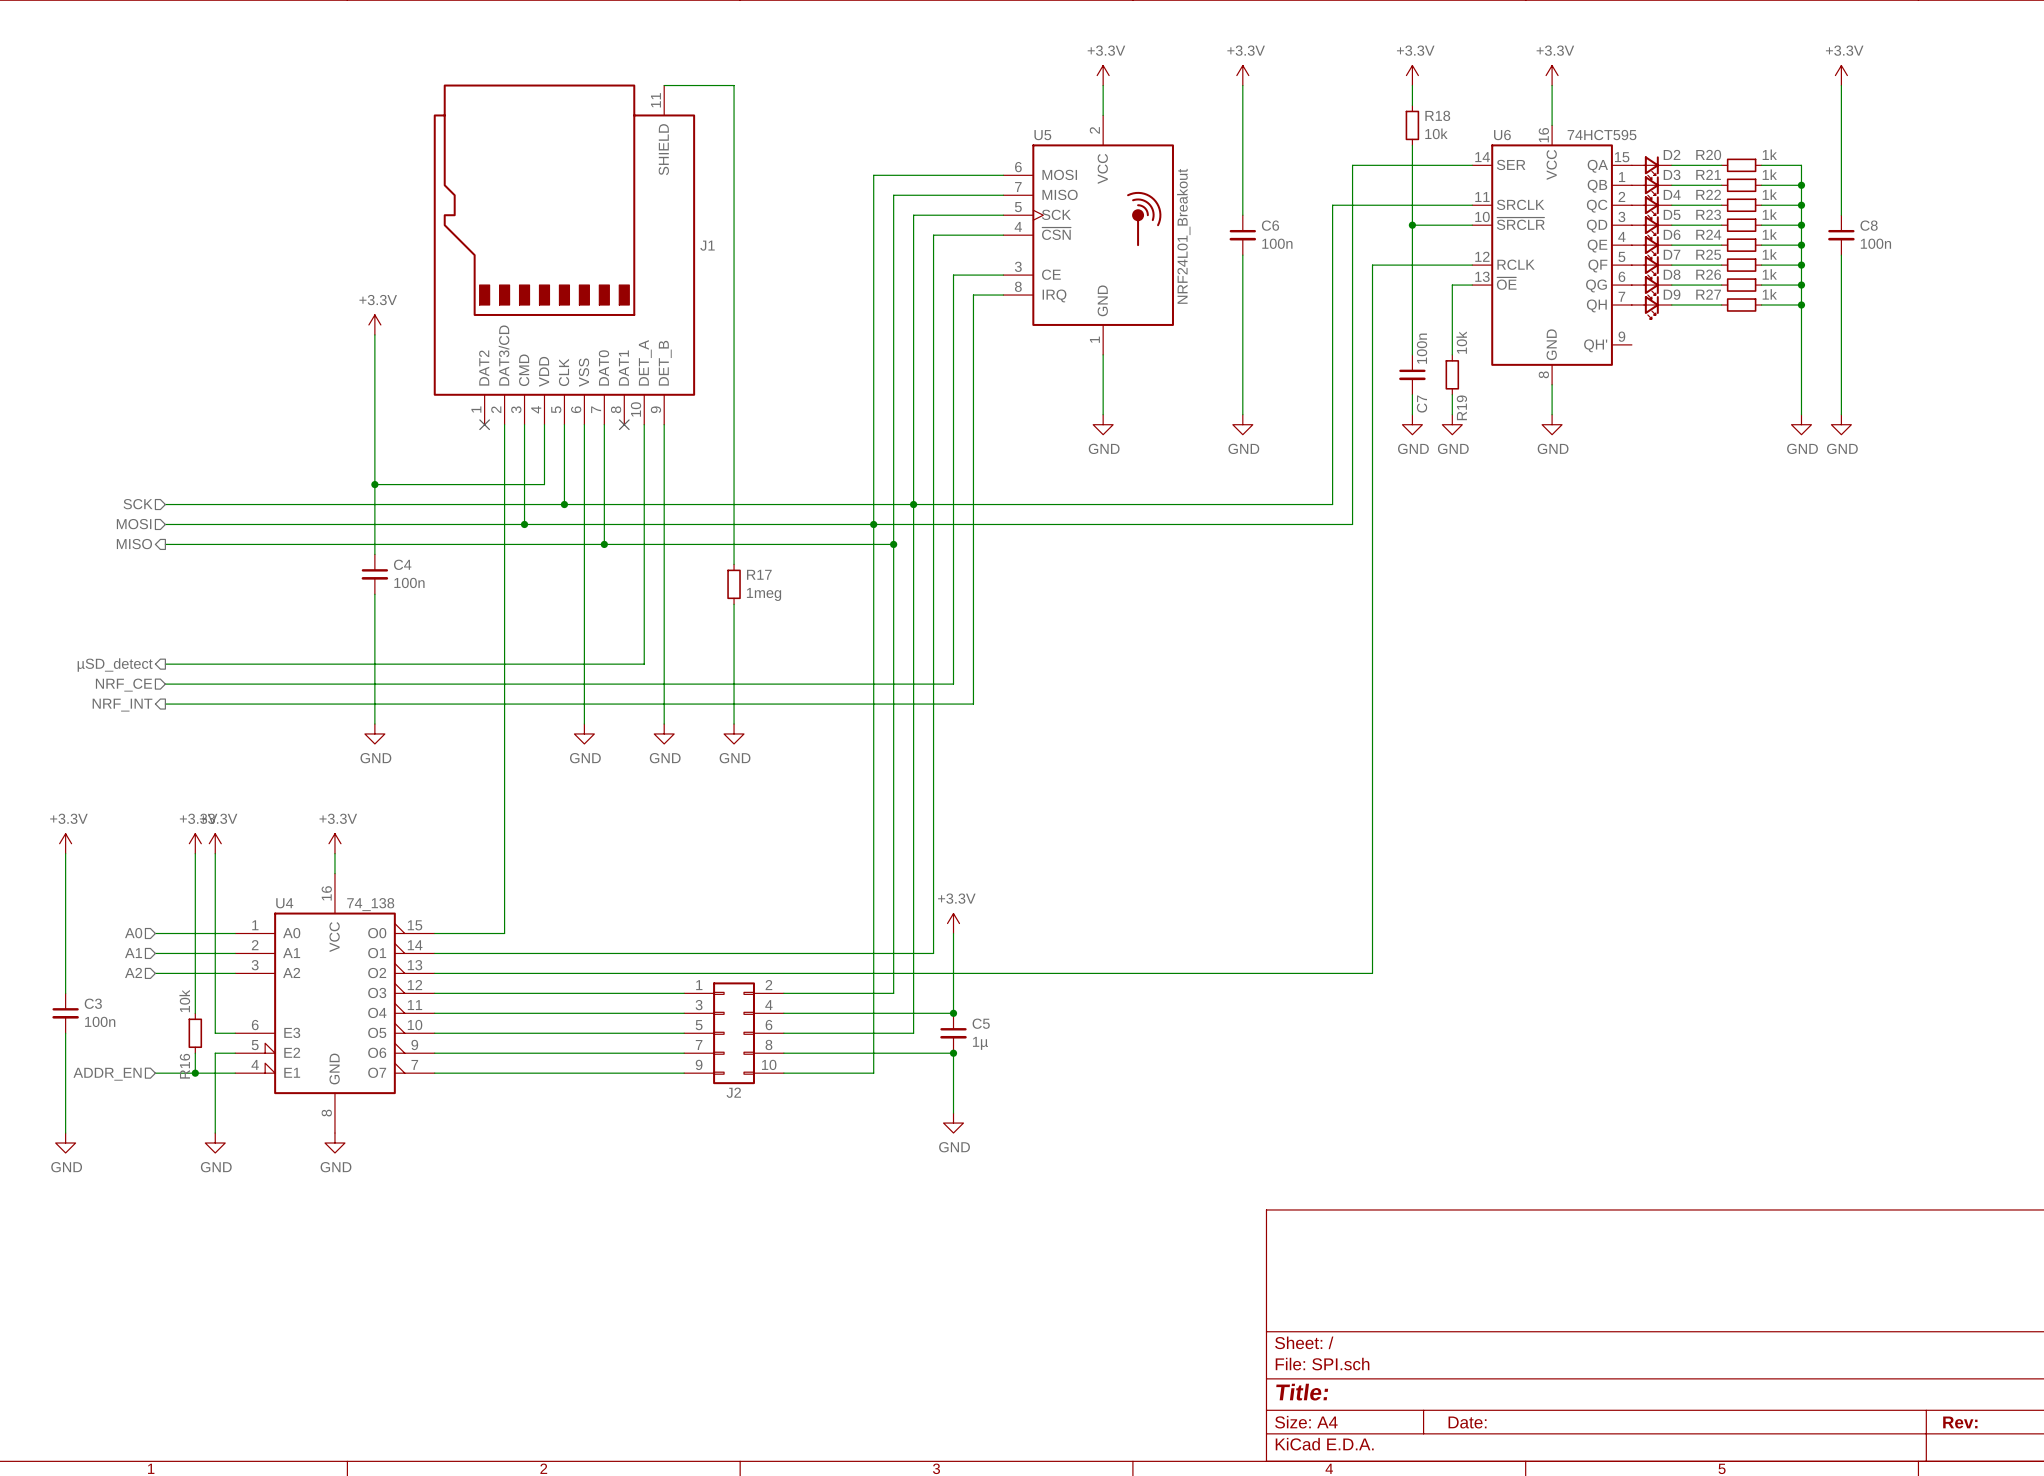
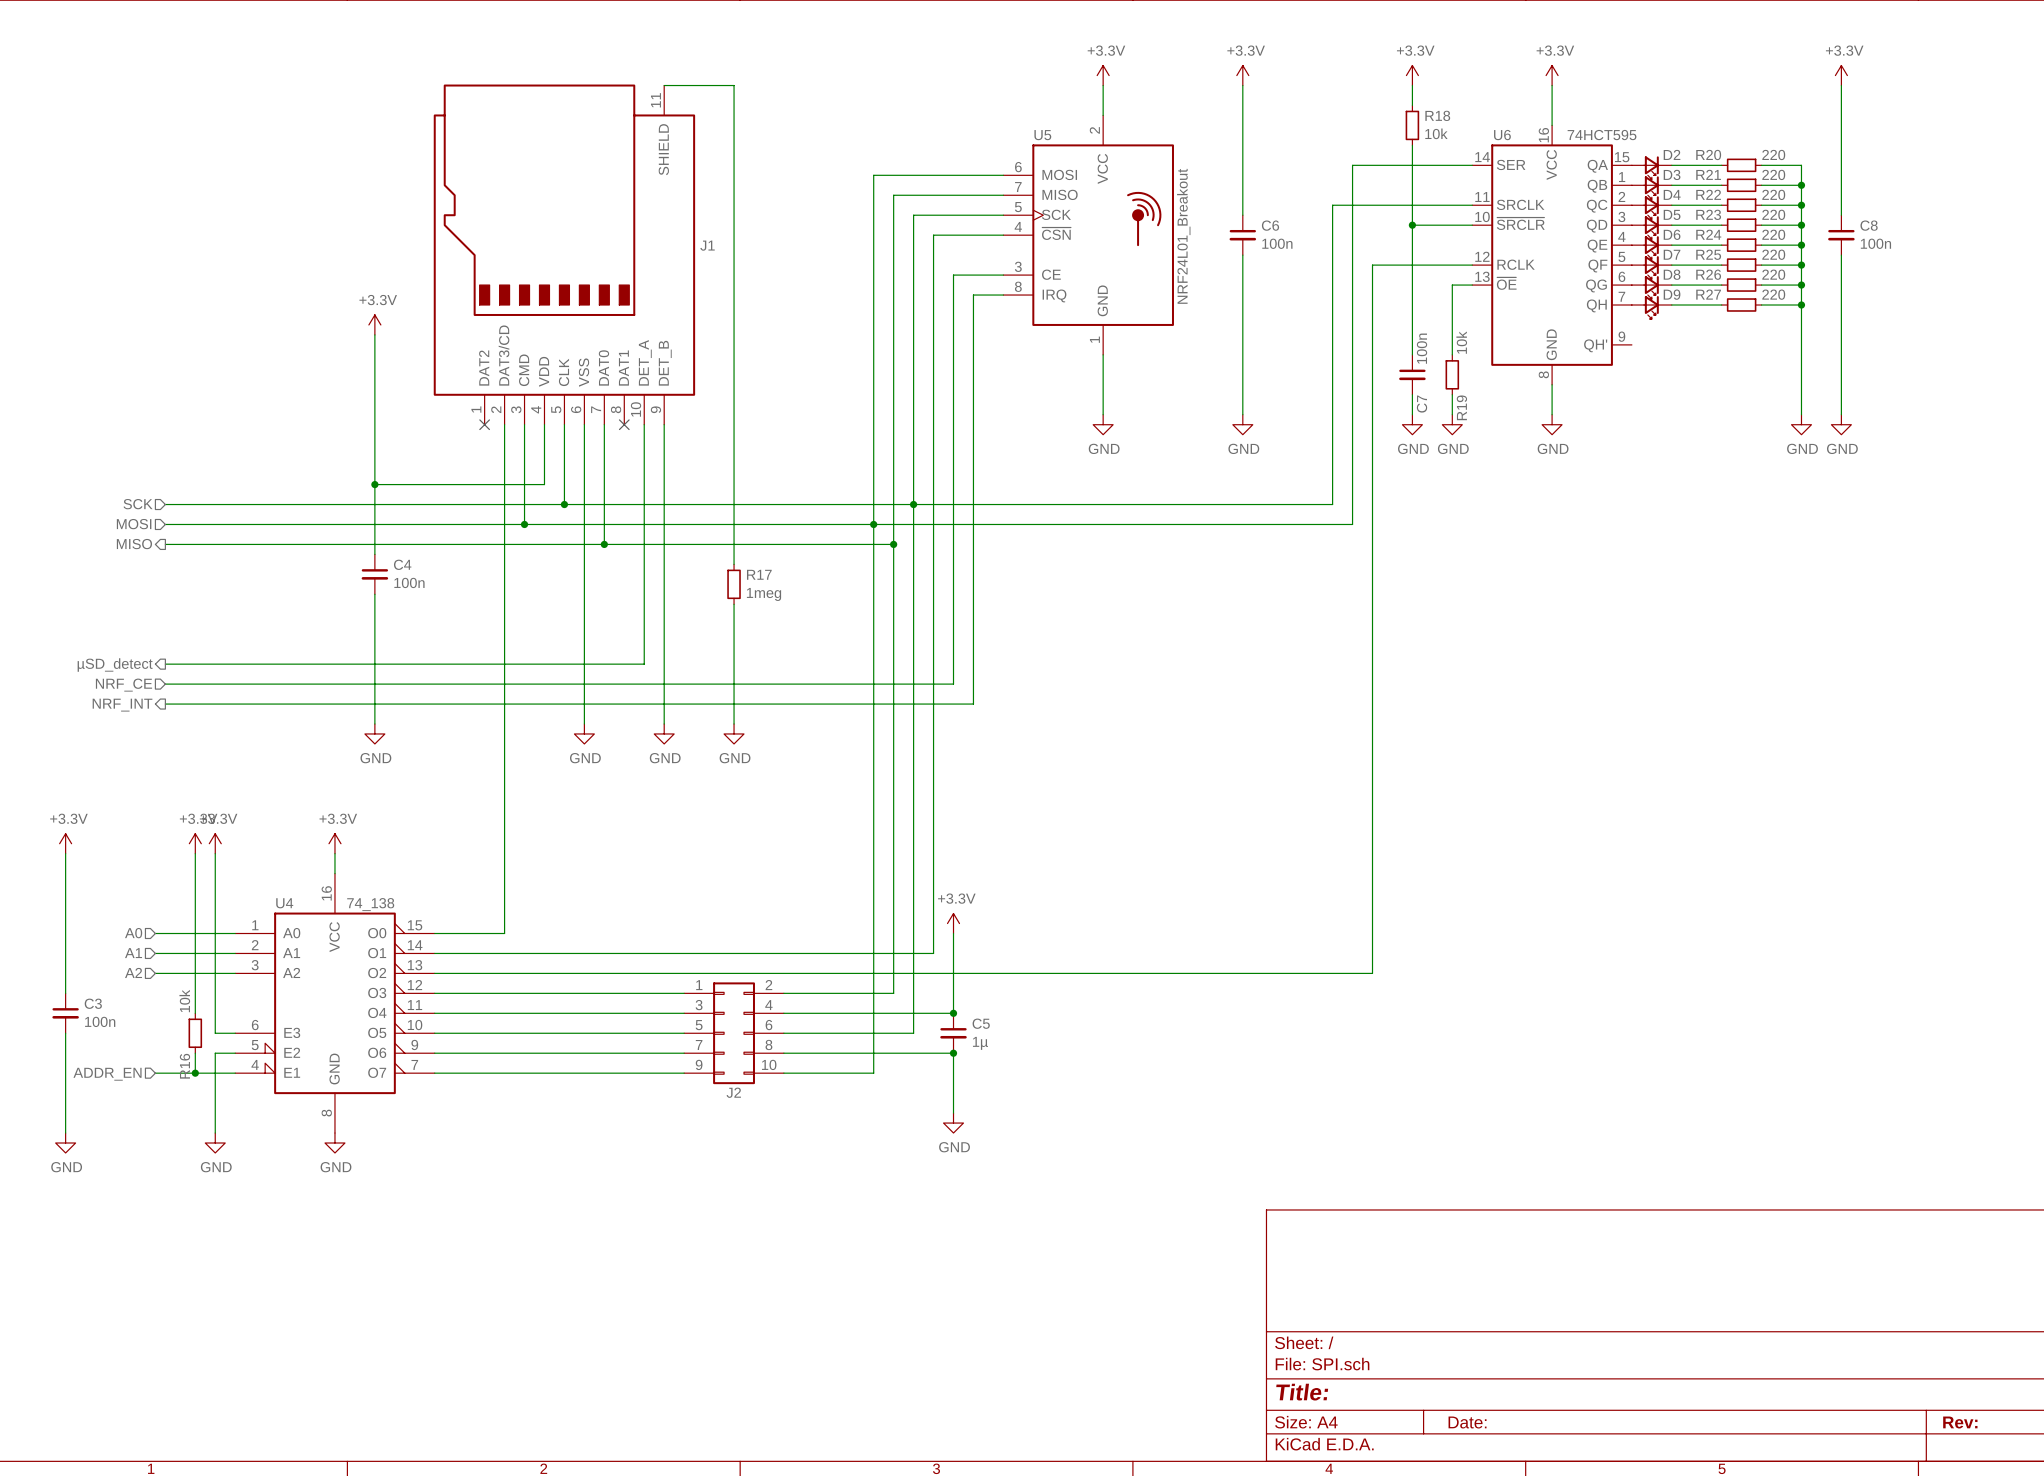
R20 value: 1k (1769, 154) -> 220 (1773, 154)
R21 value: 1k (1769, 174) -> 220 (1773, 174)
R22 value: 1k (1769, 194) -> 220 (1773, 194)
R23 value: 1k (1769, 214) -> 220 (1773, 214)
R24 value: 1k (1769, 234) -> 220 (1773, 234)
R25 value: 1k (1769, 254) -> 220 (1773, 254)
R26 value: 1k (1769, 274) -> 220 (1773, 274)
R27 value: 1k (1769, 294) -> 220 (1773, 294)

